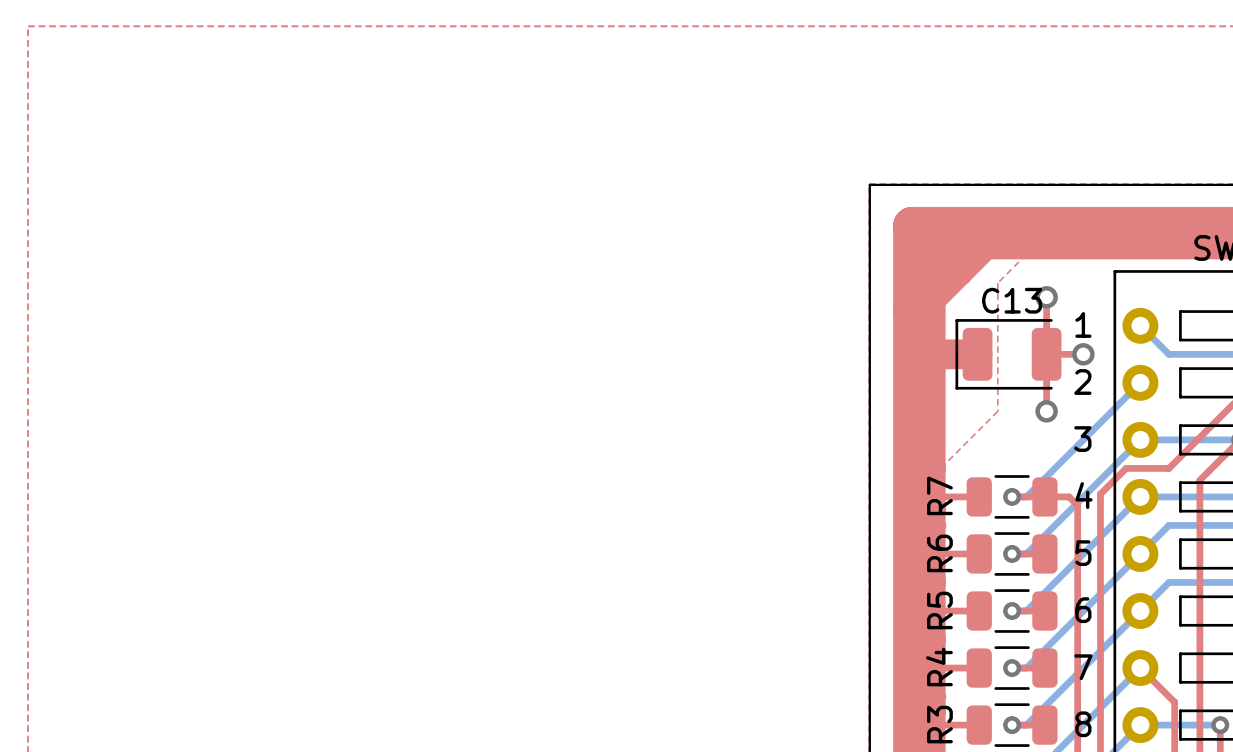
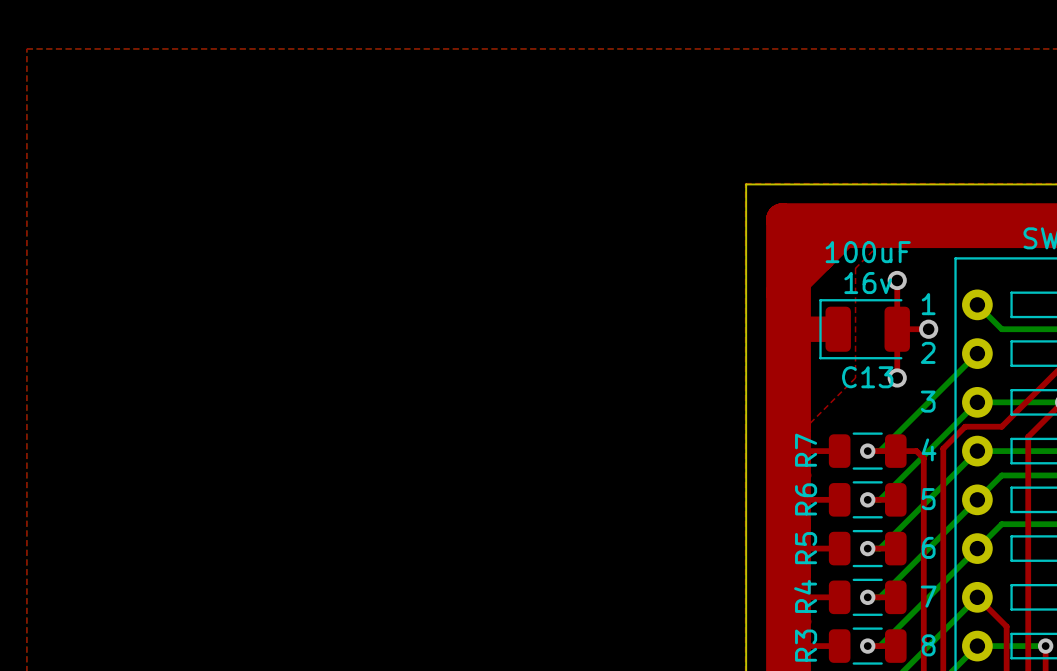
text: none -> 100uF (868, 252)
C13 name position: C13 (1012, 300) -> C13 (867, 377)
text: none -> 16v (868, 283)

